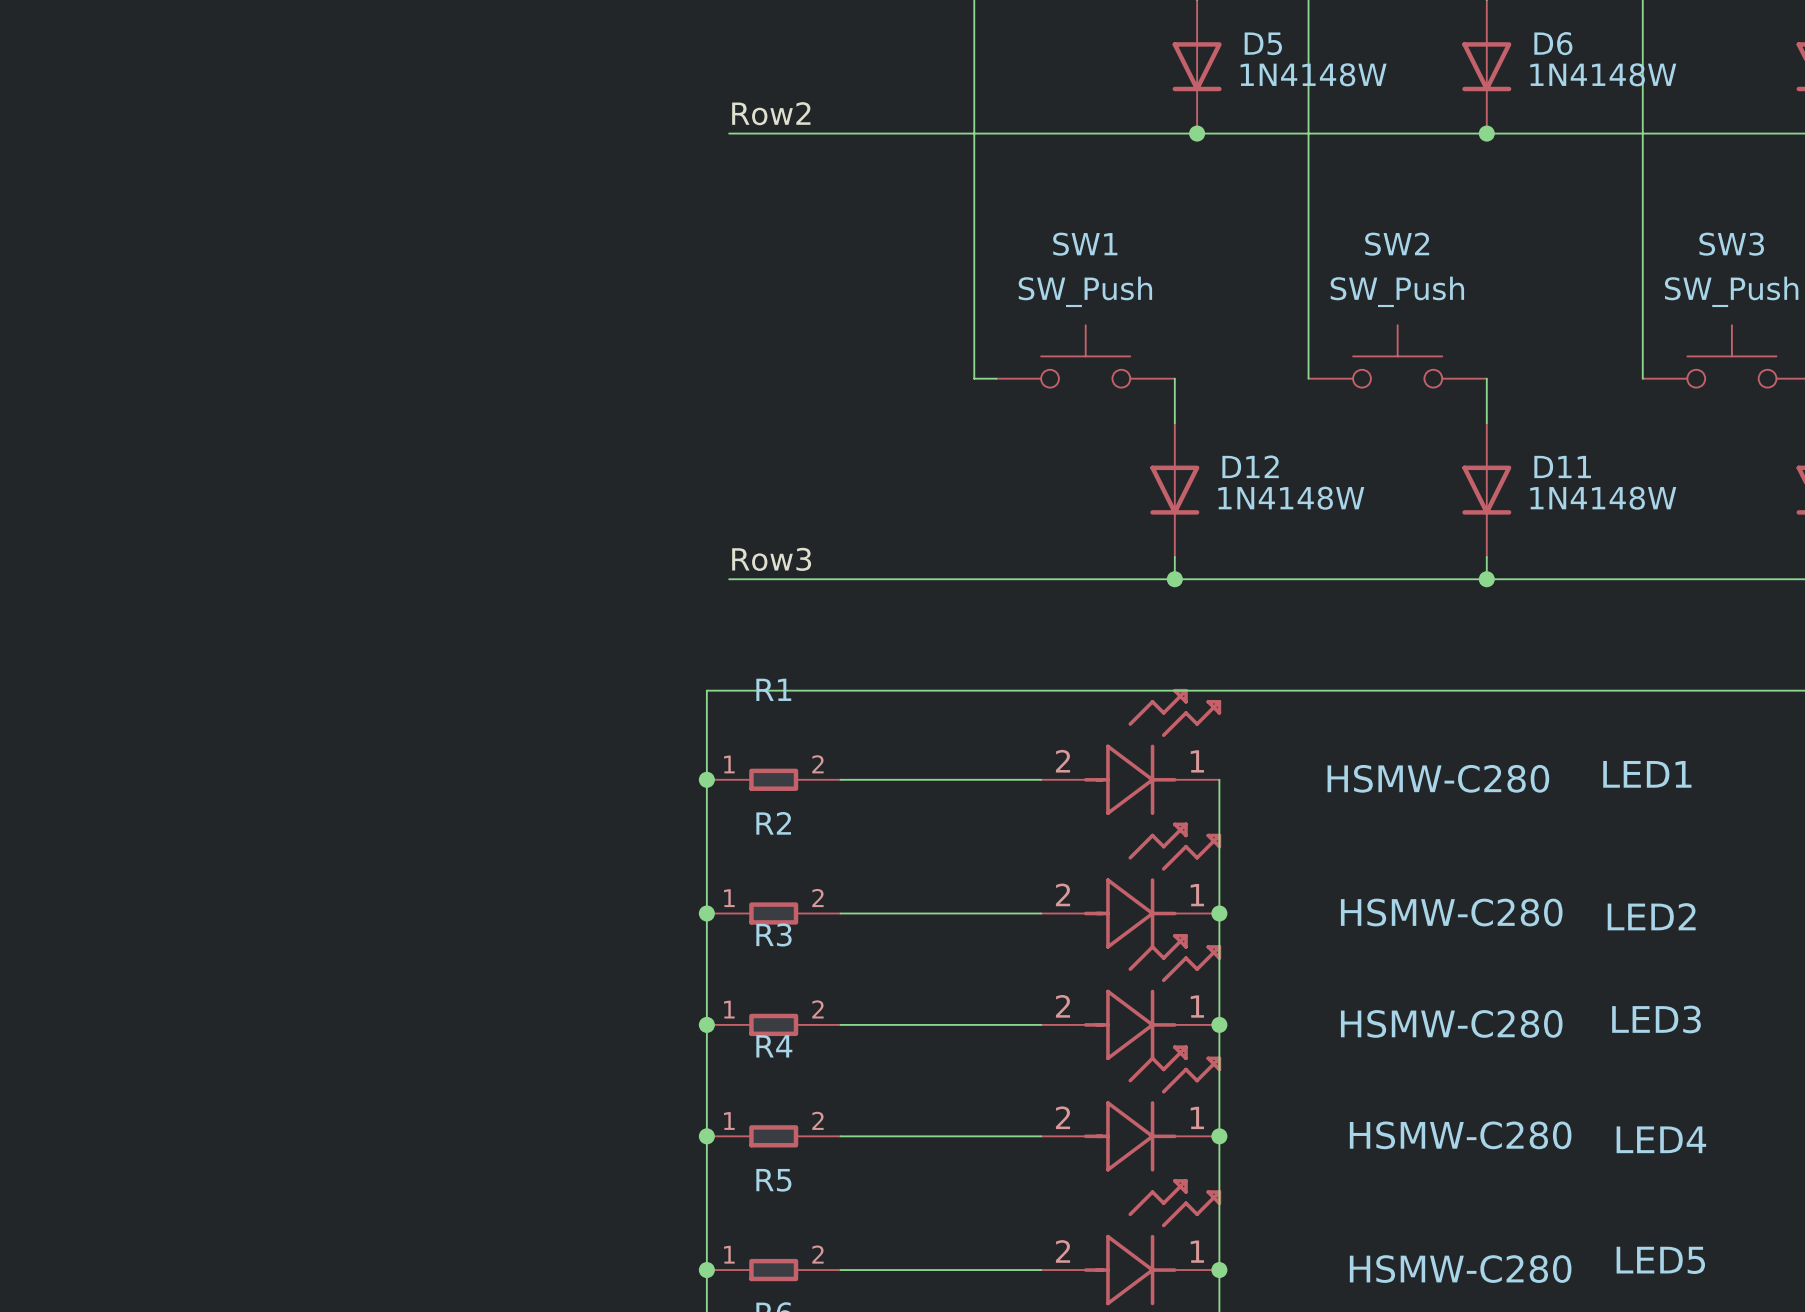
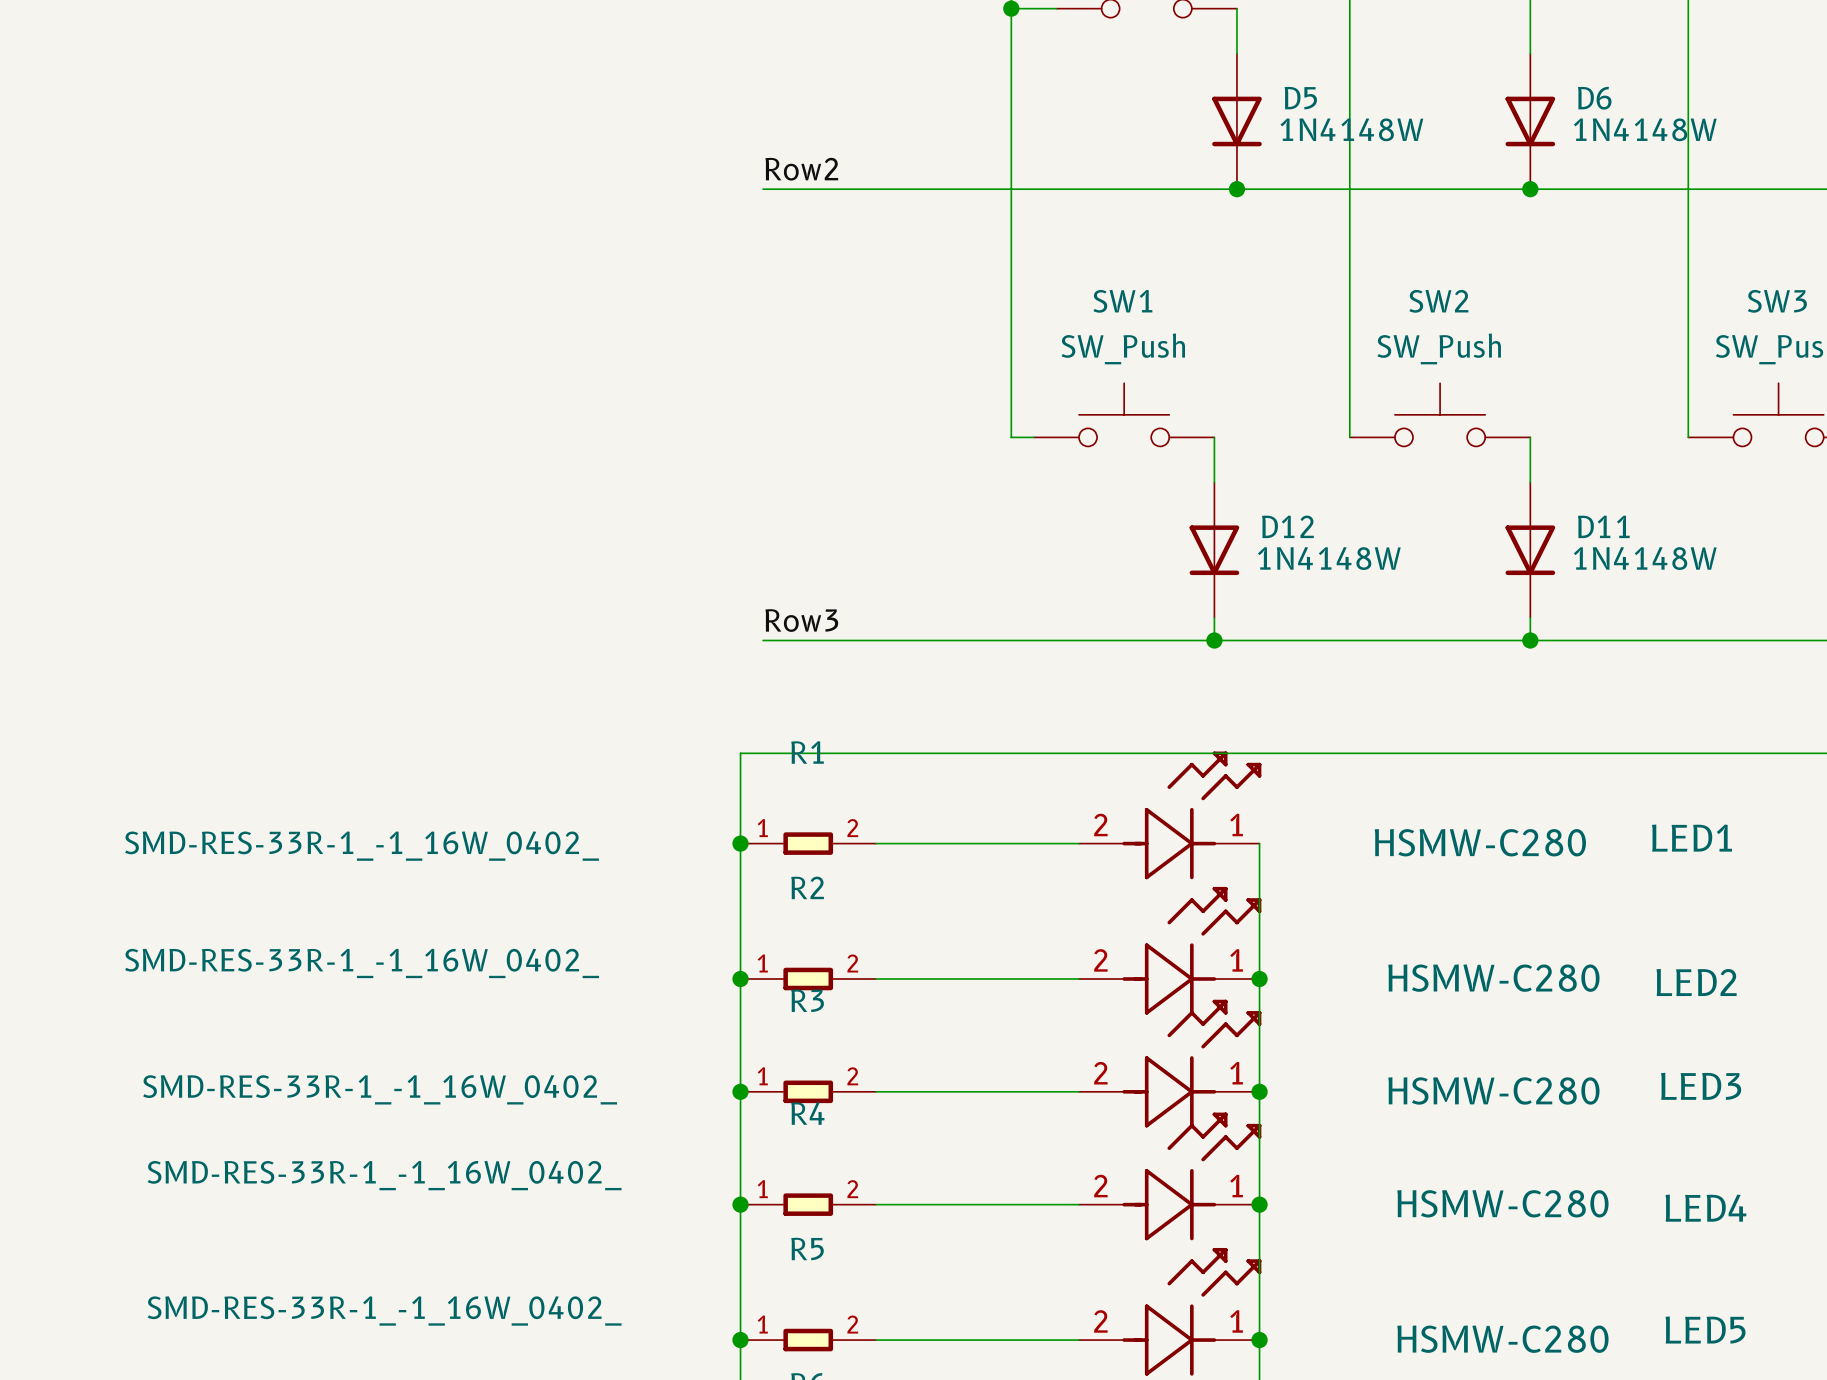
R1 value: none -> SMD-RES-33R-1_-1_16W_0402_ (362, 846)
R2 value: none -> SMD-RES-33R-1_-1_16W_0402_ (362, 963)
R3 value: none -> SMD-RES-33R-1_-1_16W_0402_ (380, 1089)
R4 value: none -> SMD-RES-33R-1_-1_16W_0402_ (384, 1175)
R5 value: none -> SMD-RES-33R-1_-1_16W_0402_ (384, 1310)

